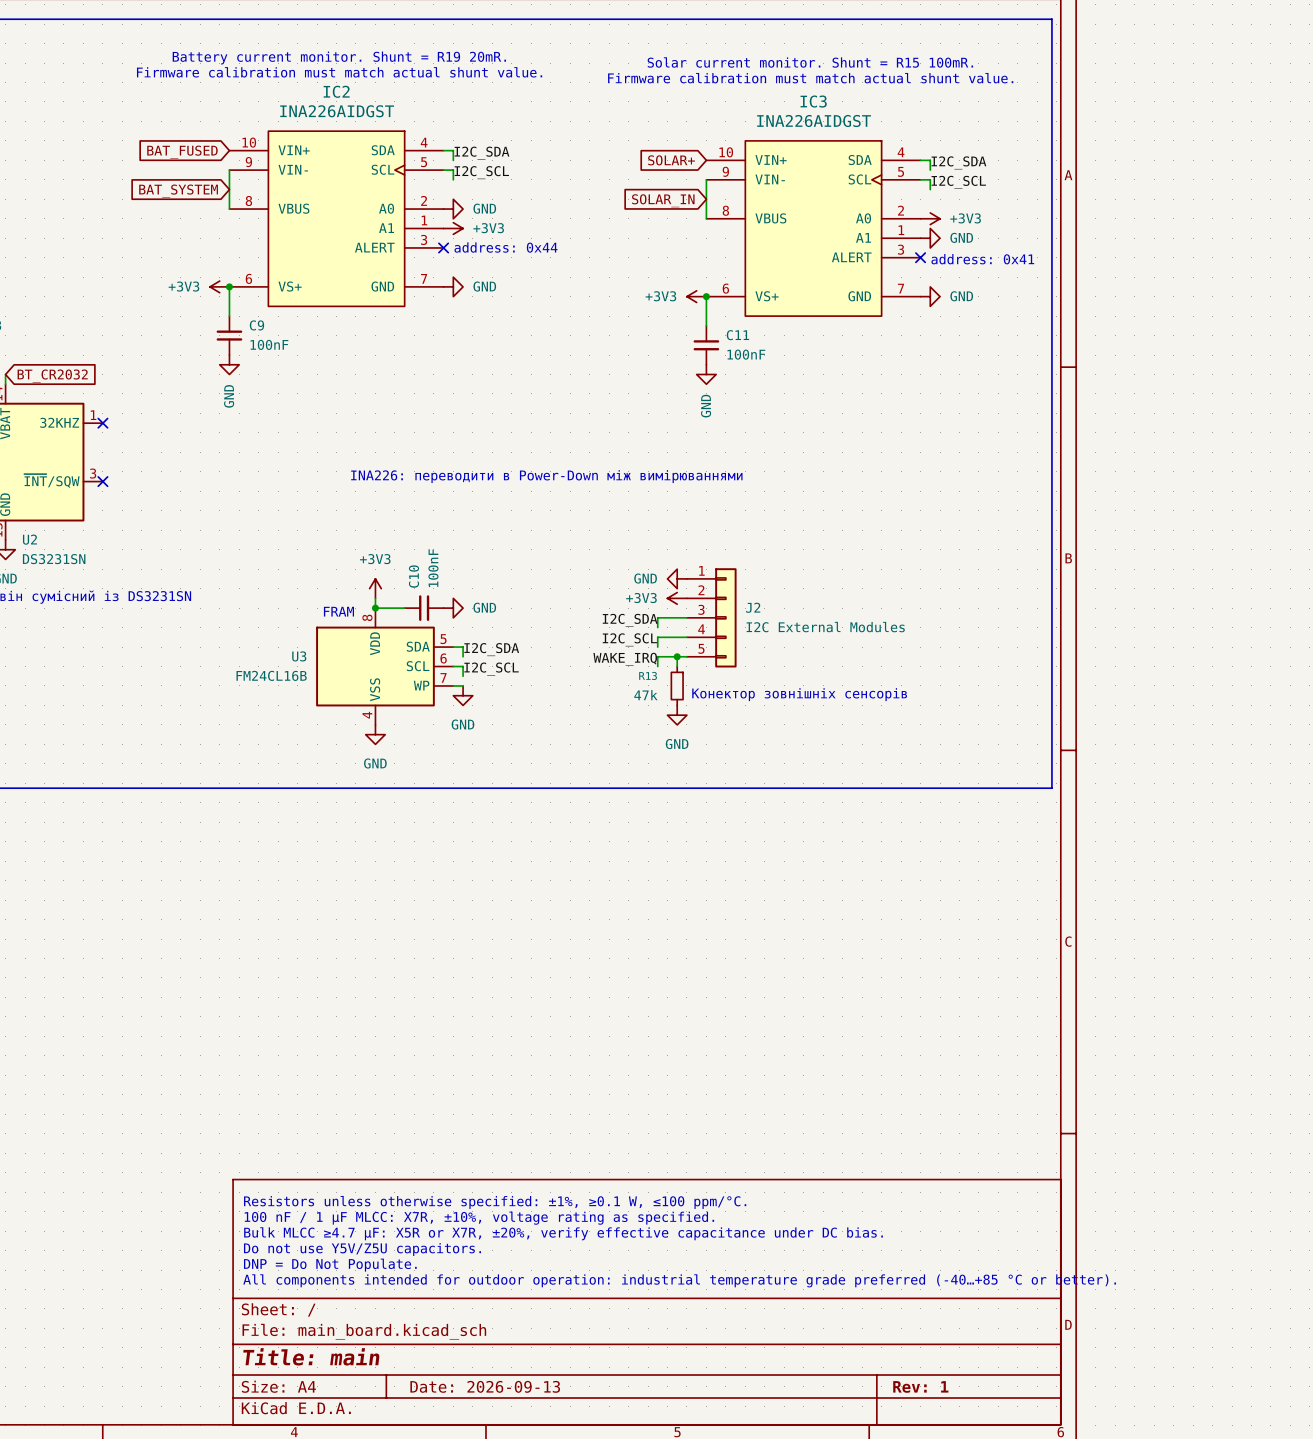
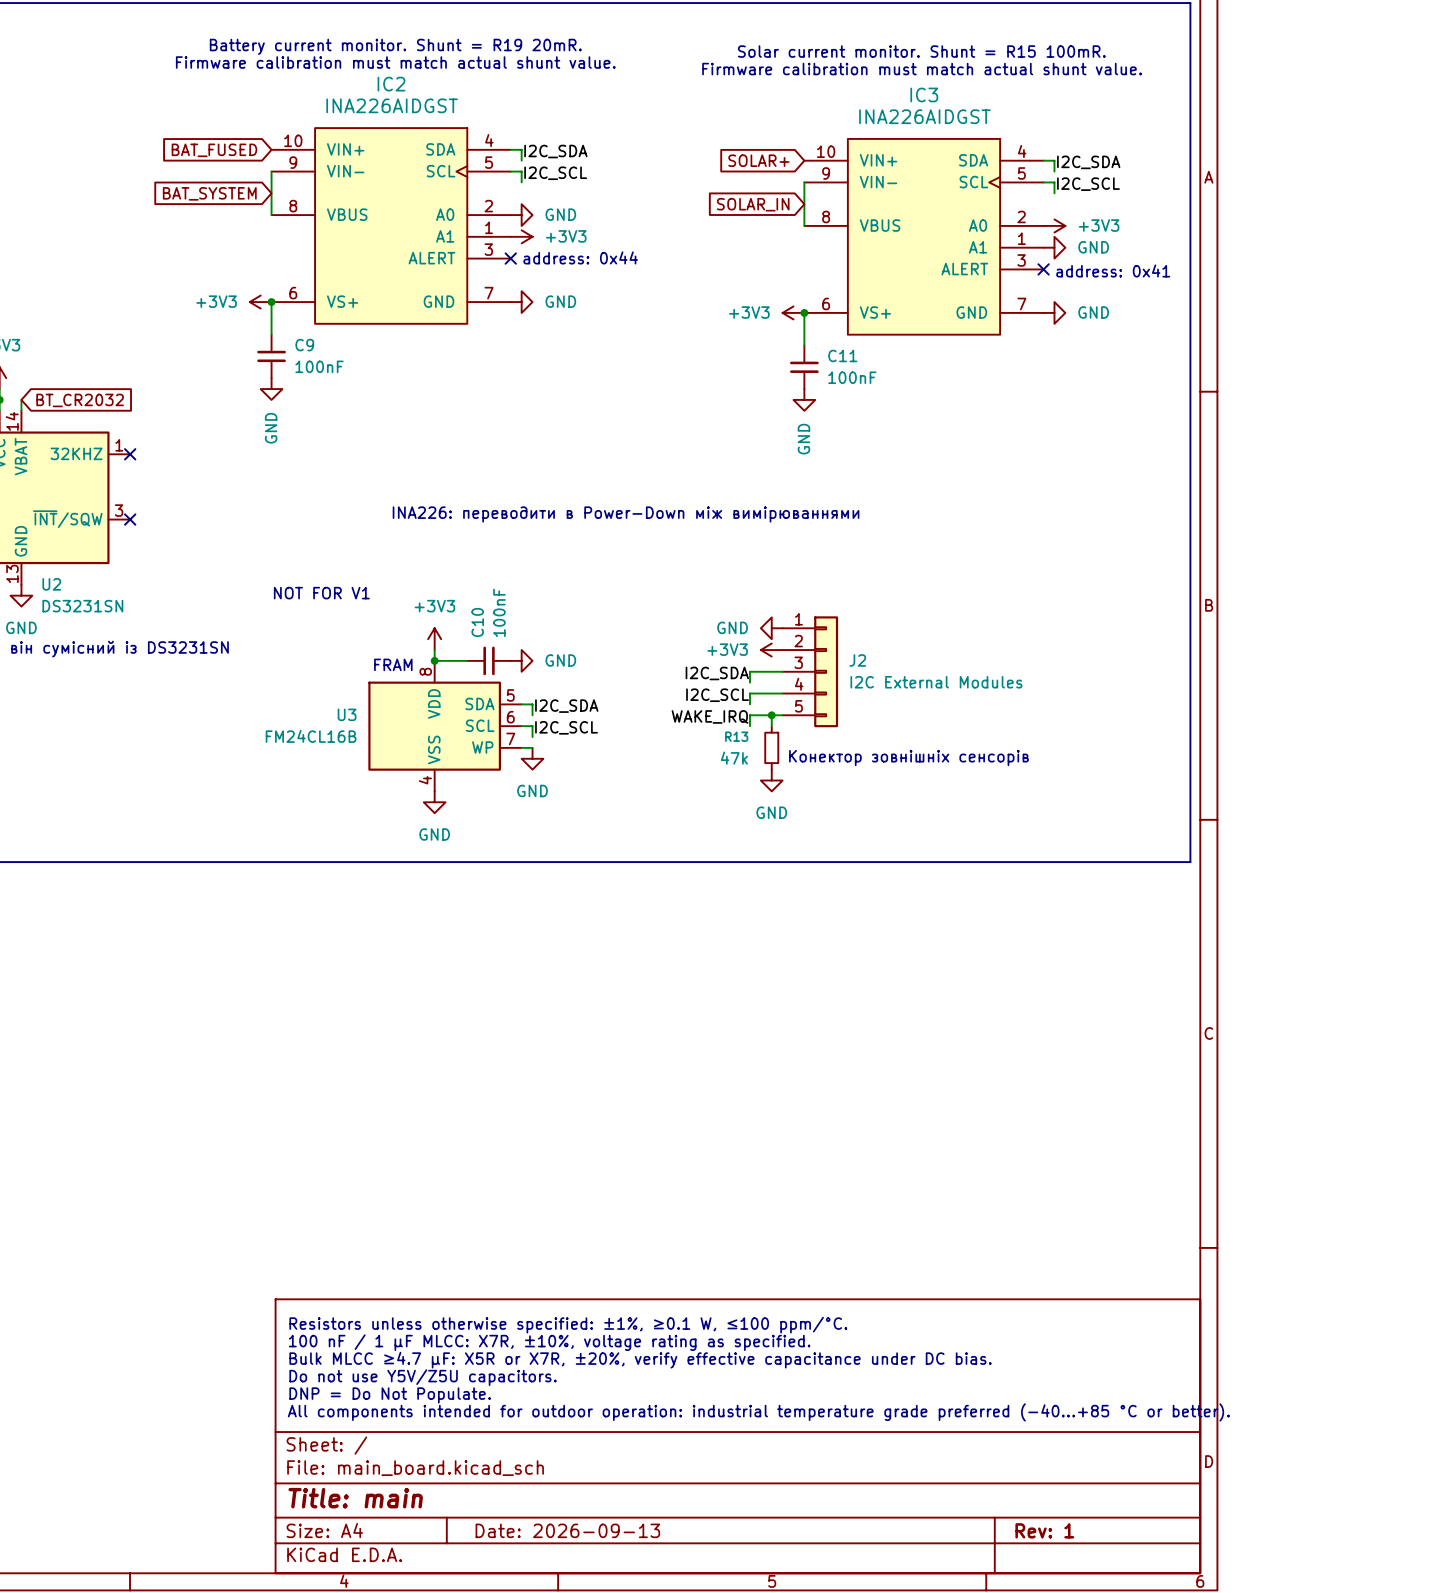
text: none -> NOT FOR V1 (321, 593)

